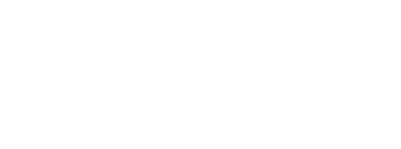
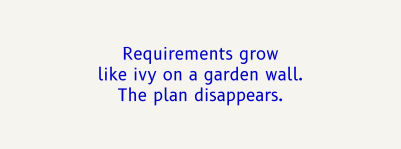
text: none -> Requirements grow (200, 55)
text: none -> like ivy on a garden wall. (200, 75)
text: none -> The plan disappears. (200, 96)

